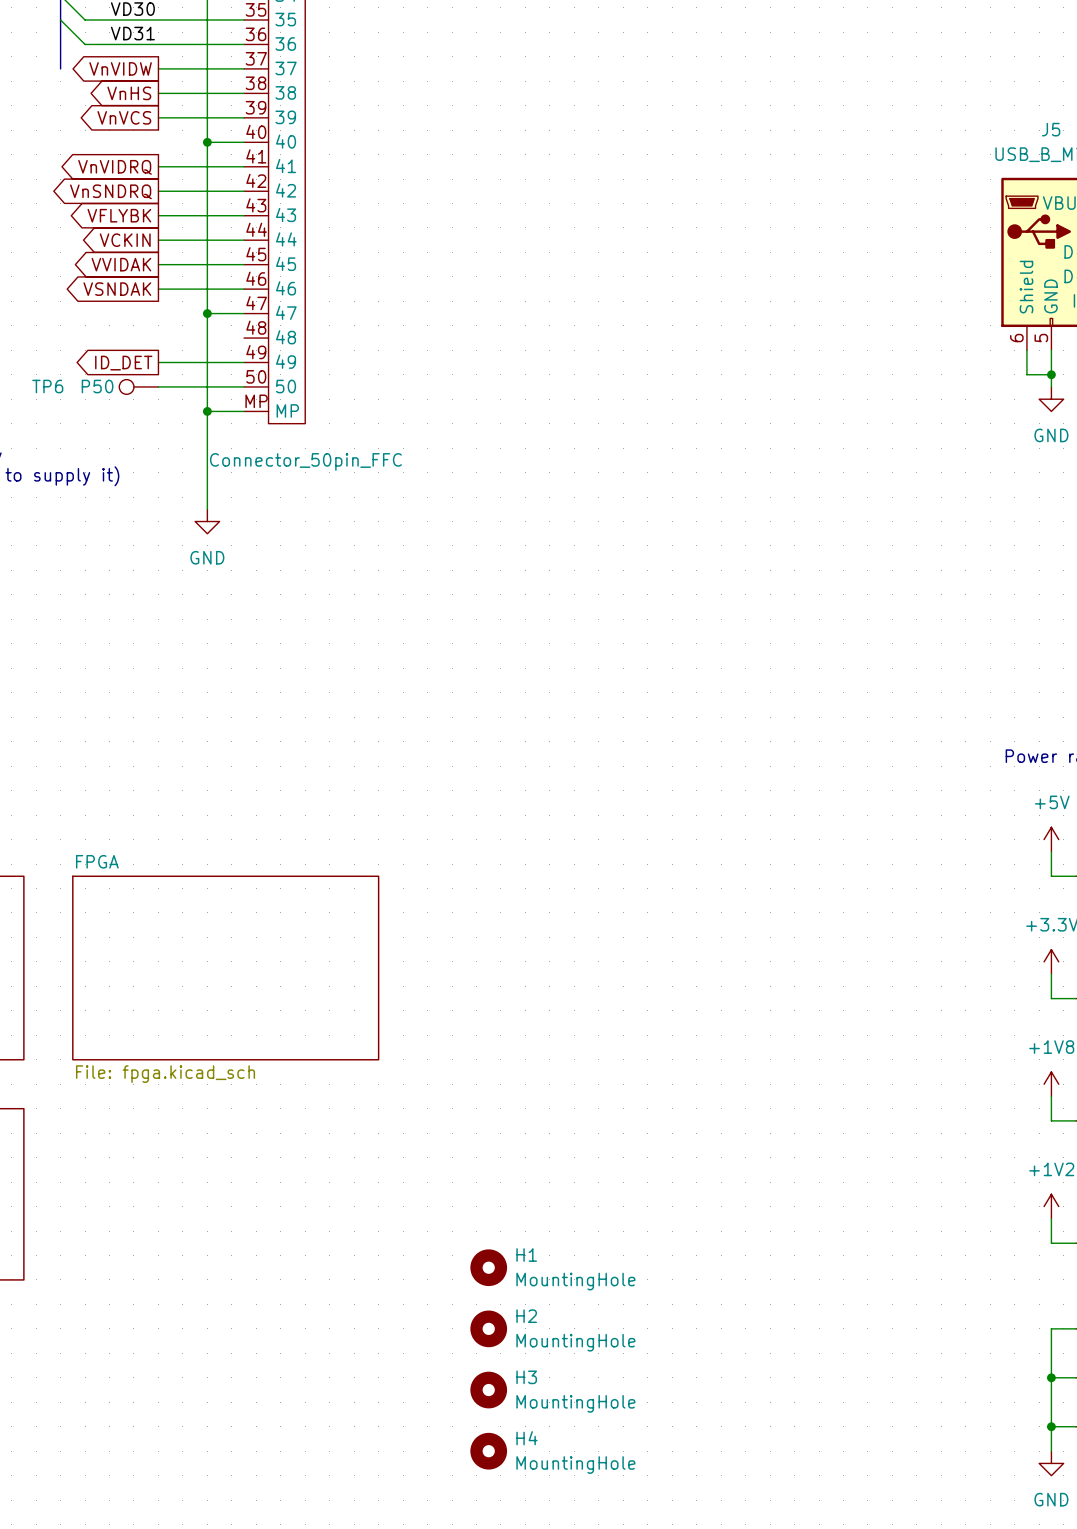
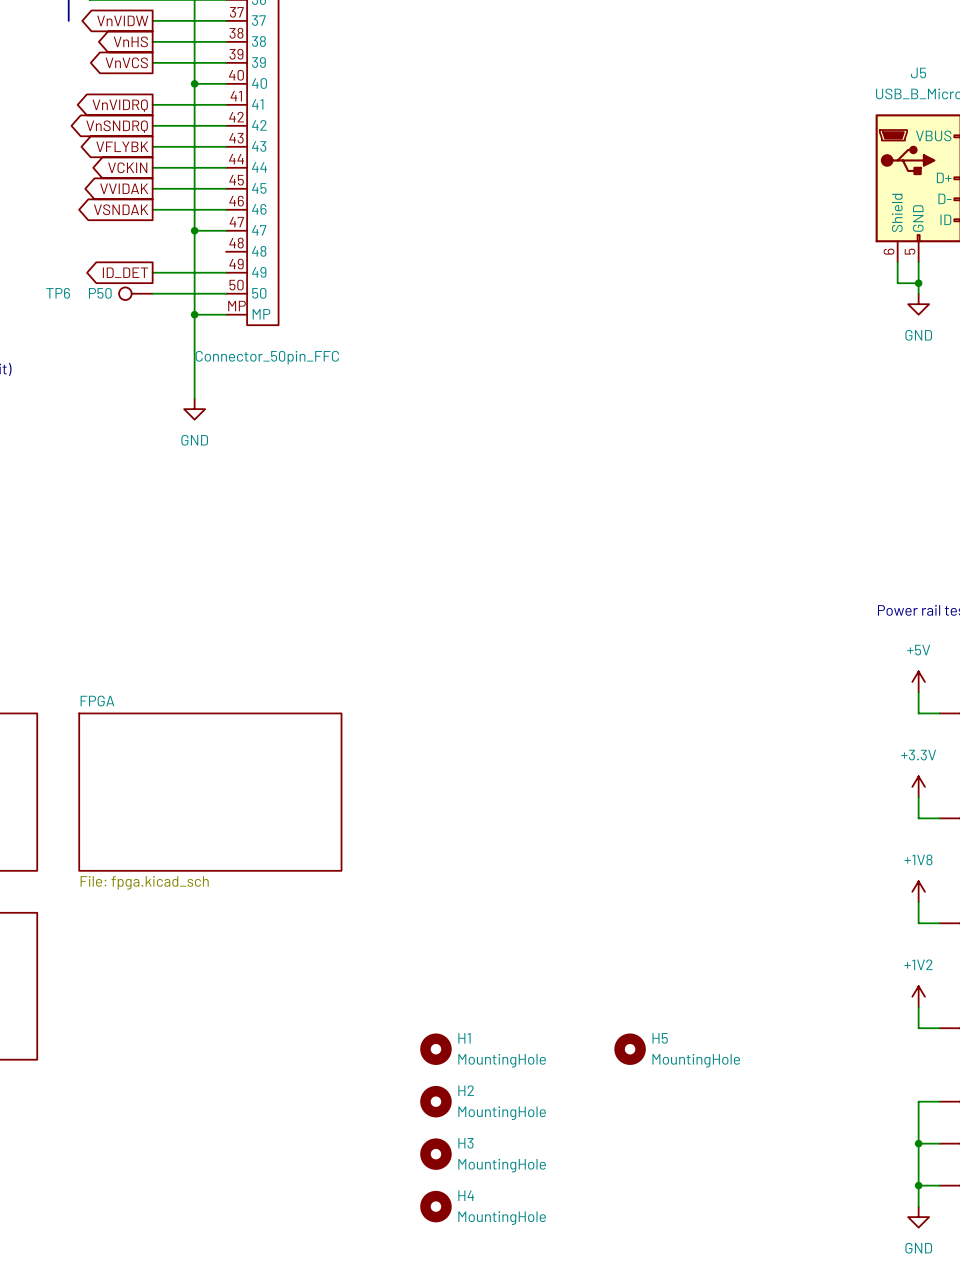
H5: none -> MountingHole (630, 1049)

